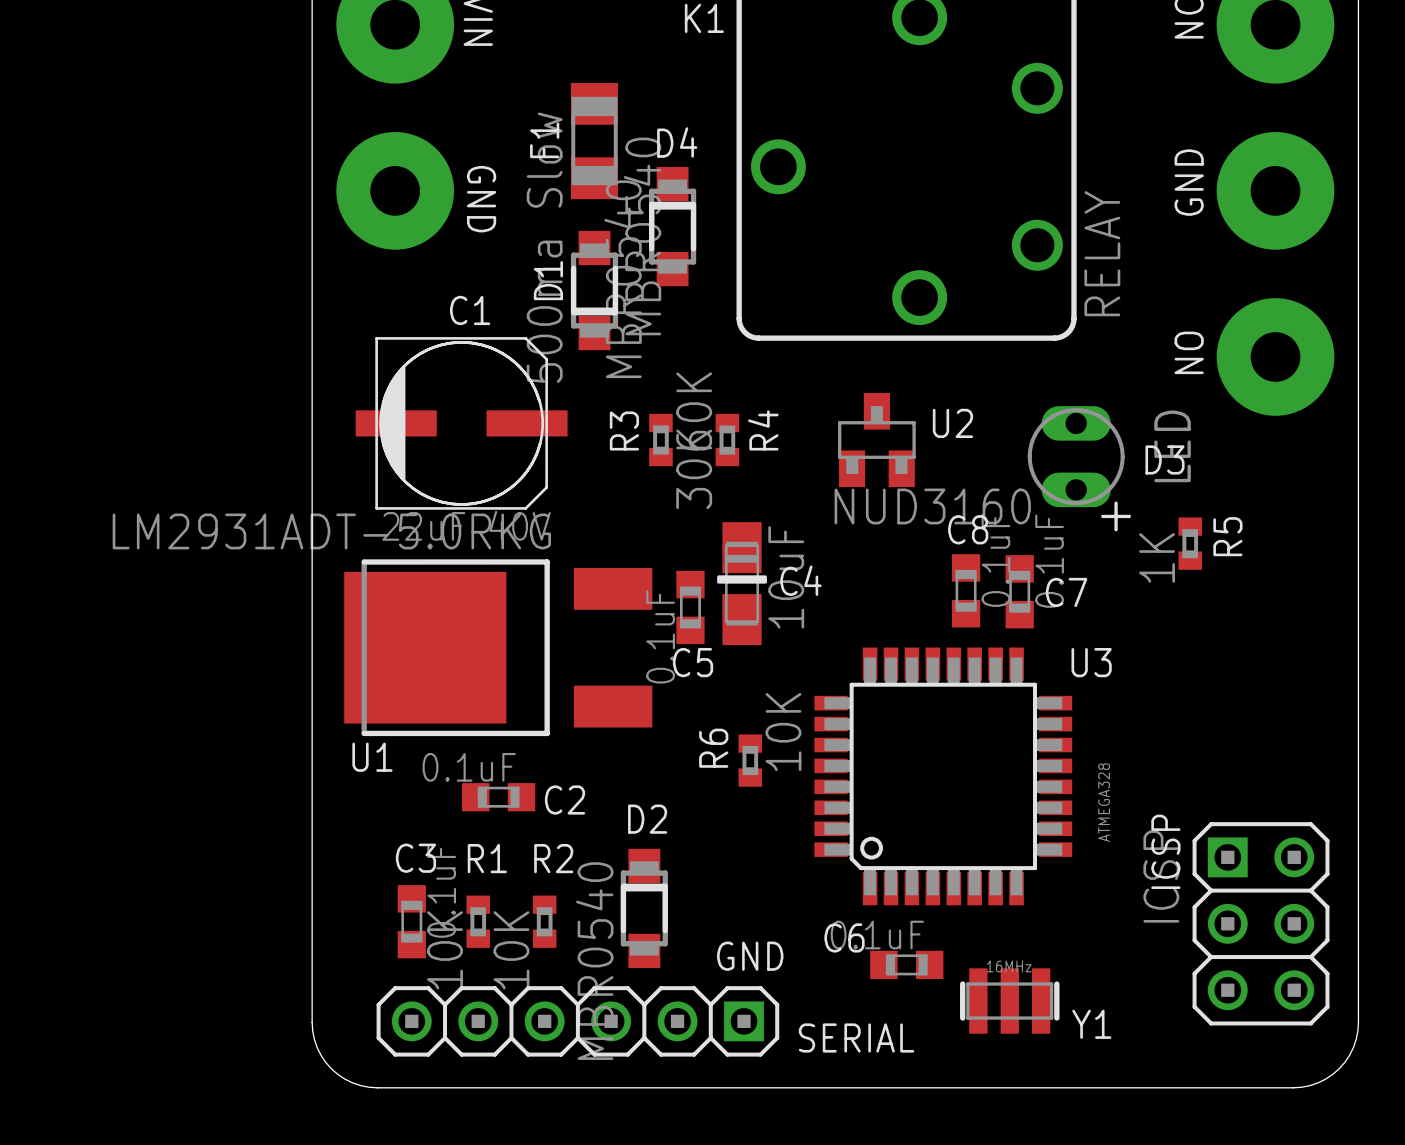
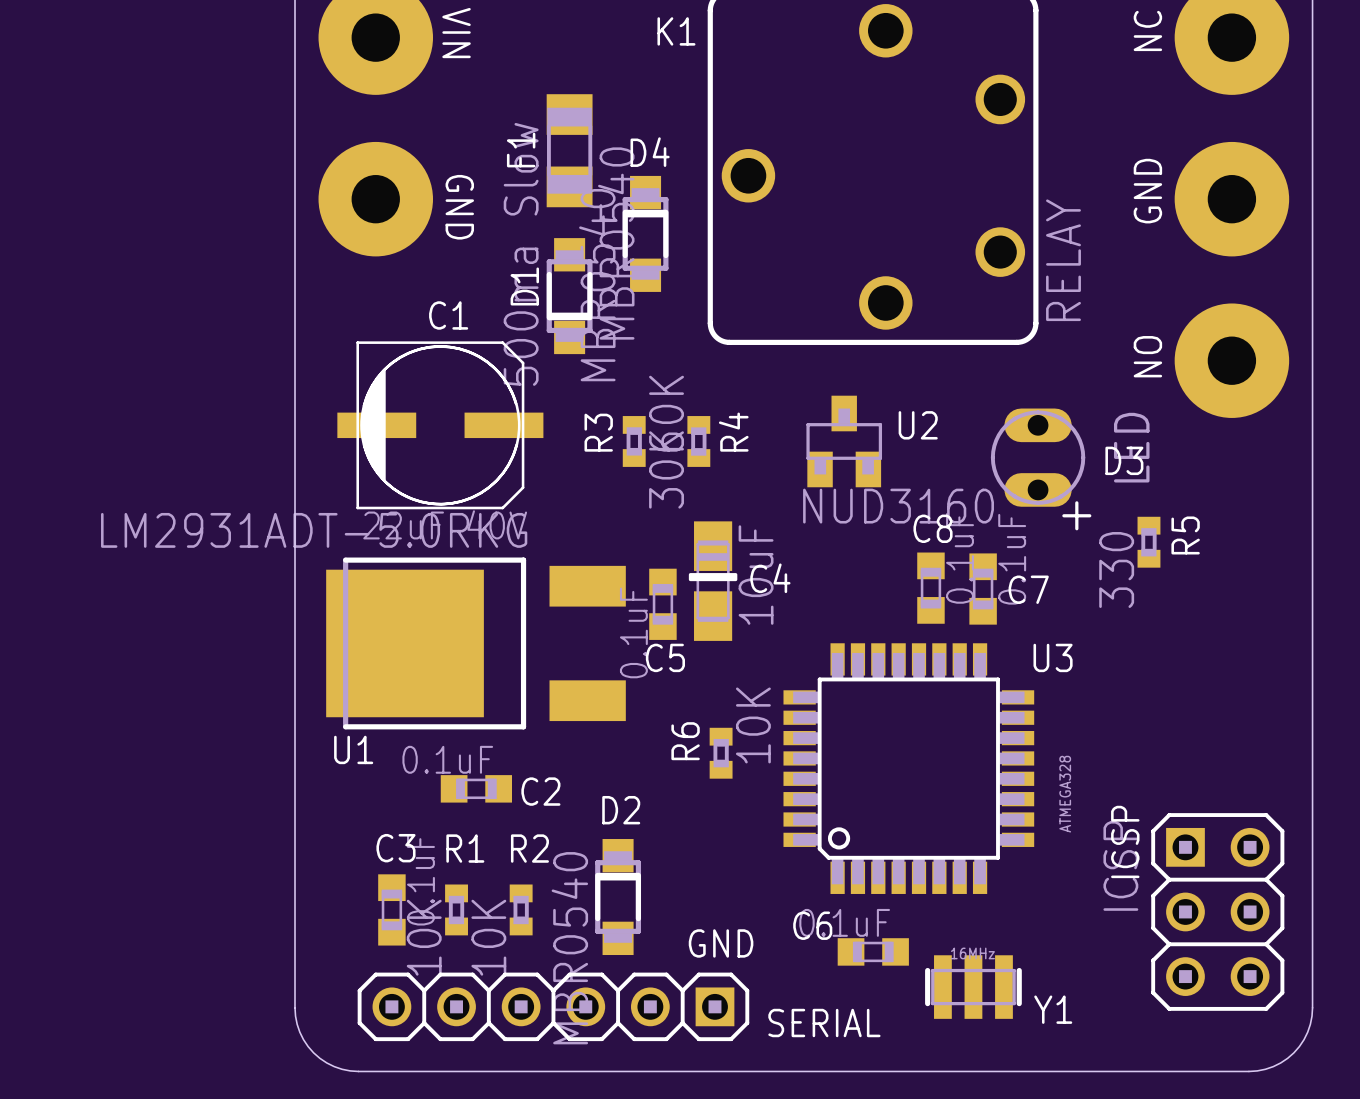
R5 value: 1K (1157, 557) -> 330 (1116, 569)

